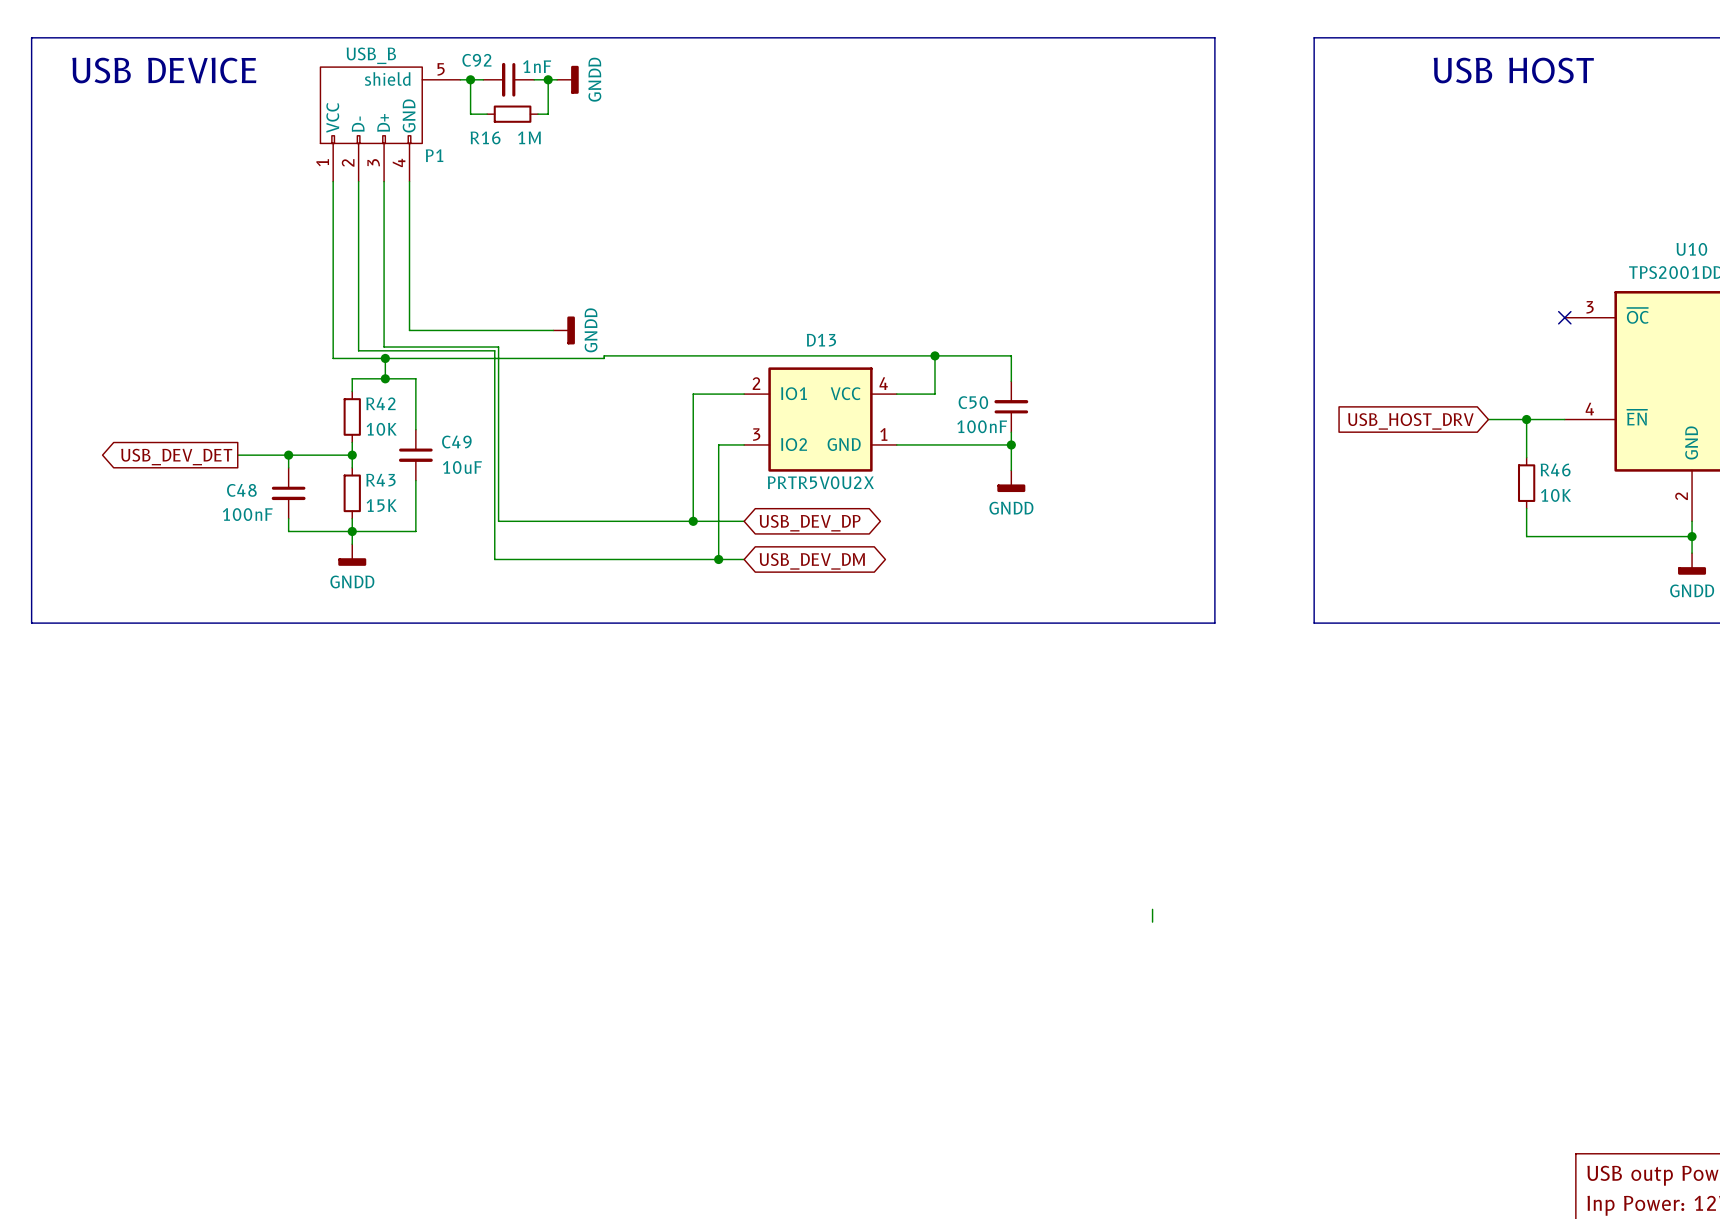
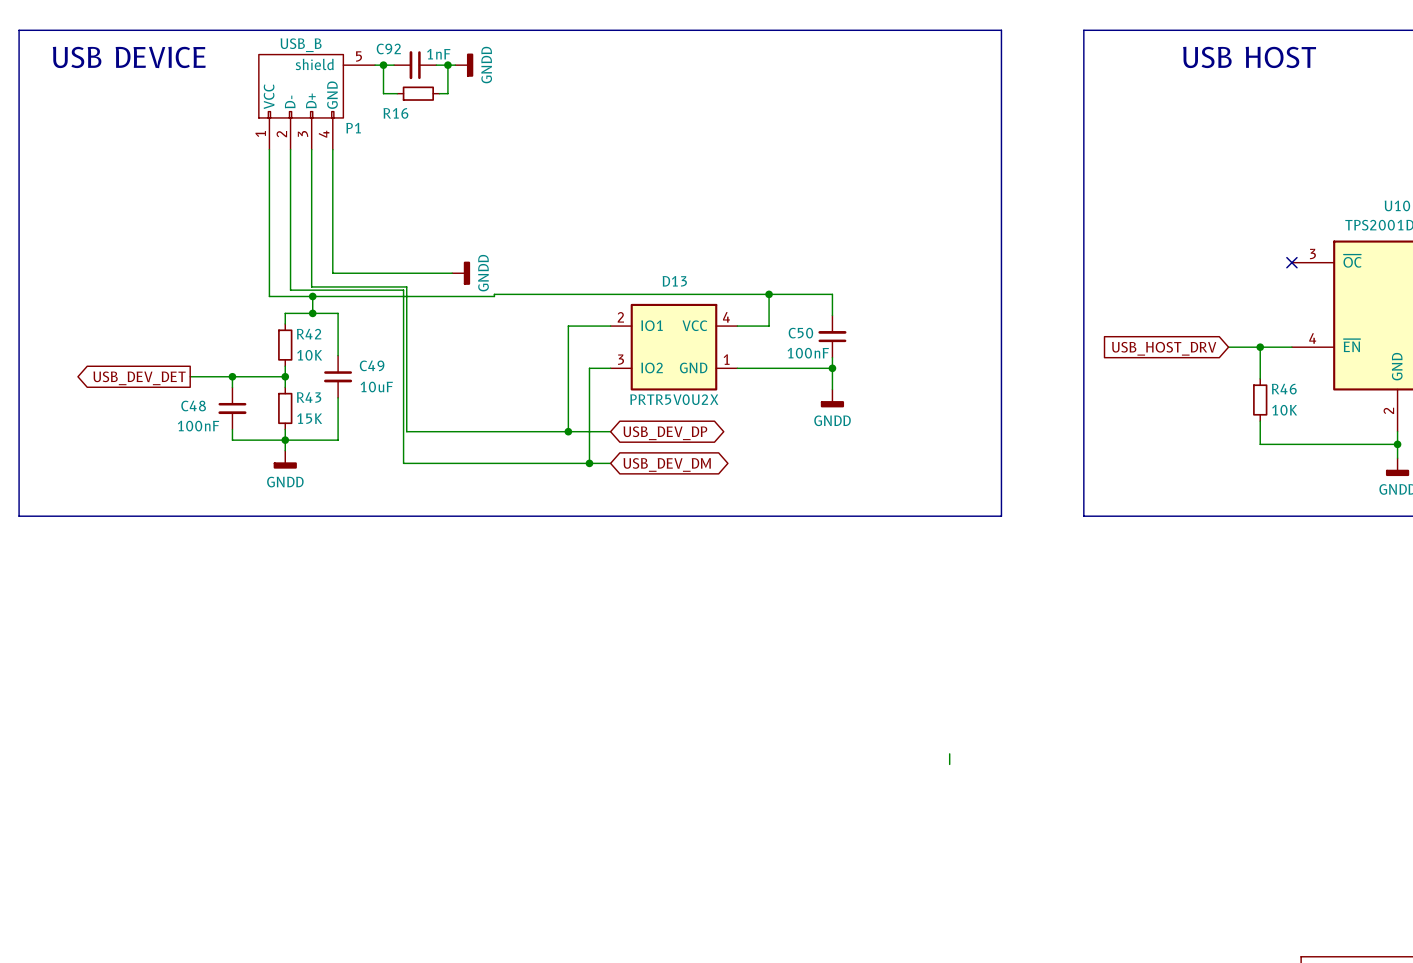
R16 value: 1M (529, 137) -> none

